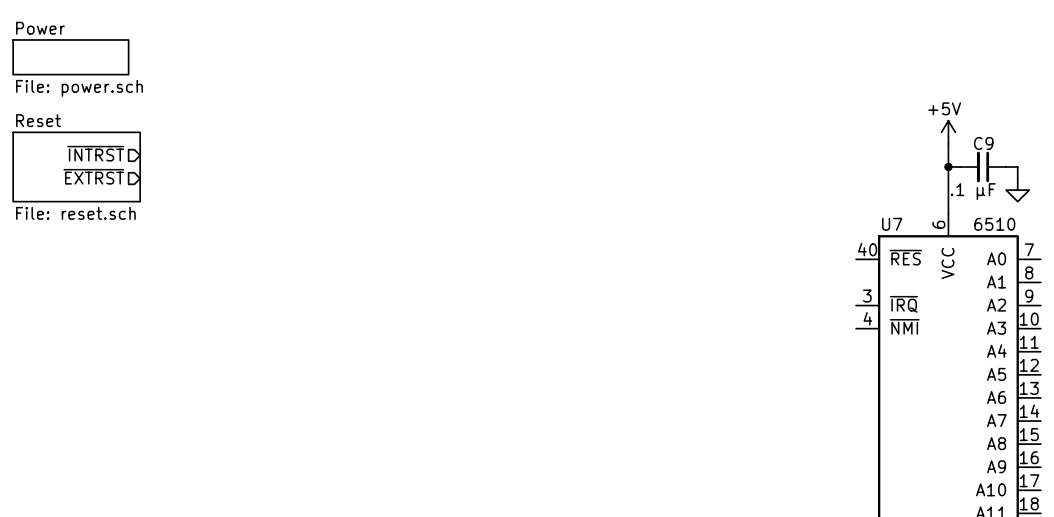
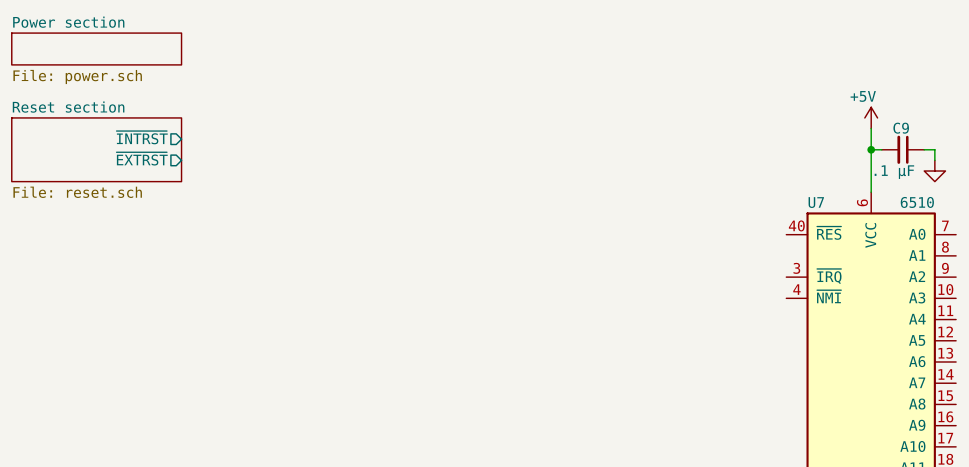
sheet Power: File: power.sch (70, 57) -> none
sheet Power section: none -> File: power.sch (96, 48)
sheet pin position: ~{INTRST} (95, 153) -> ~{INTRST} (142, 137)
sheet Reset: File: reset.sch (76, 166) -> none
sheet Reset section: none -> File: reset.sch (96, 149)
sheet pin position: ~{EXTRST} (93, 176) -> ~{EXTRST} (142, 158)

